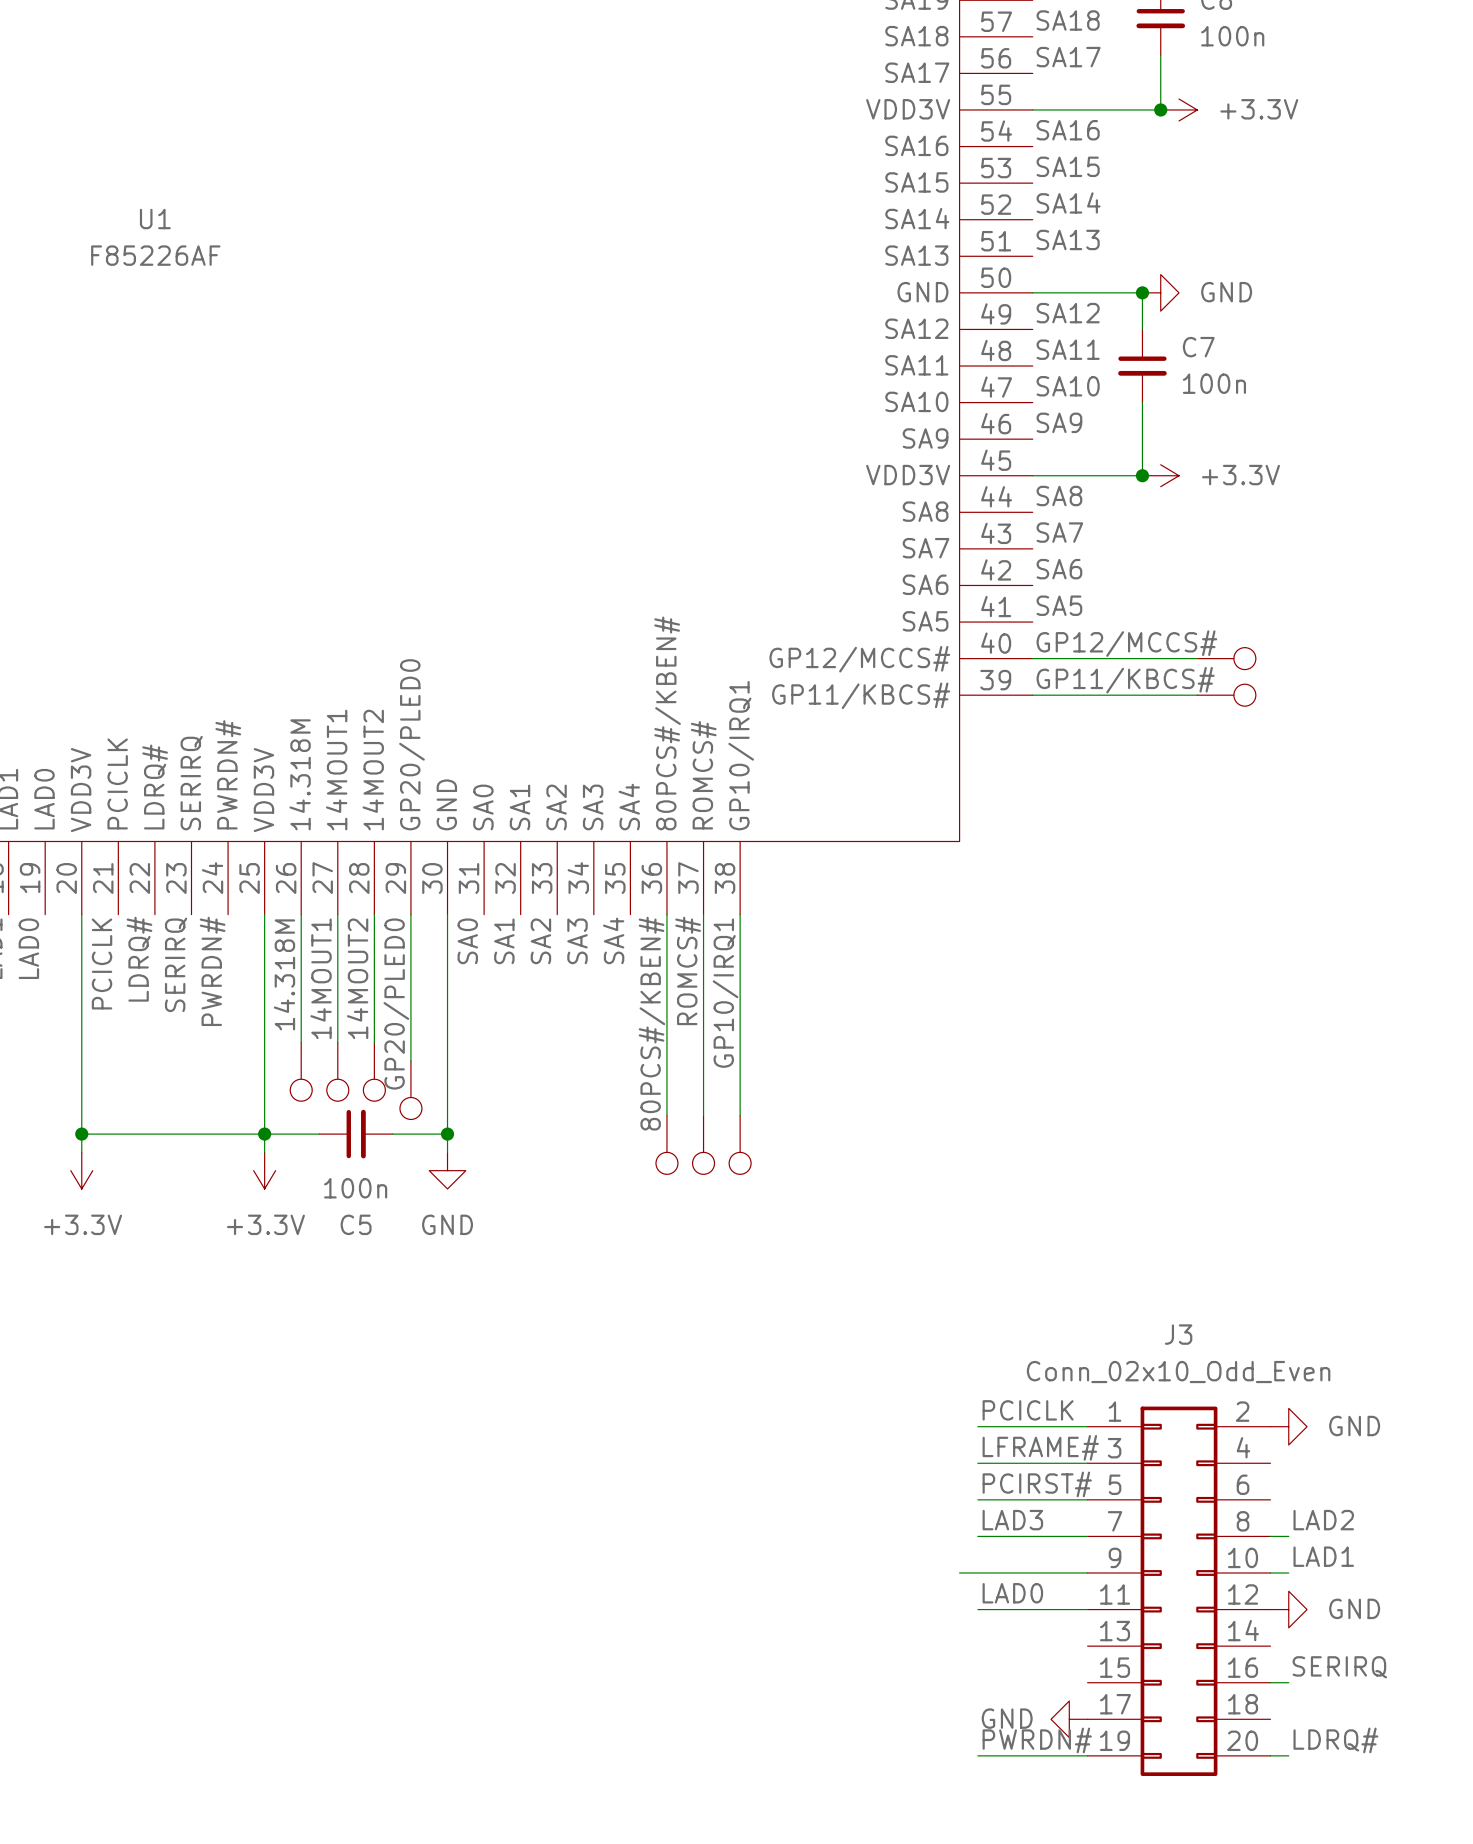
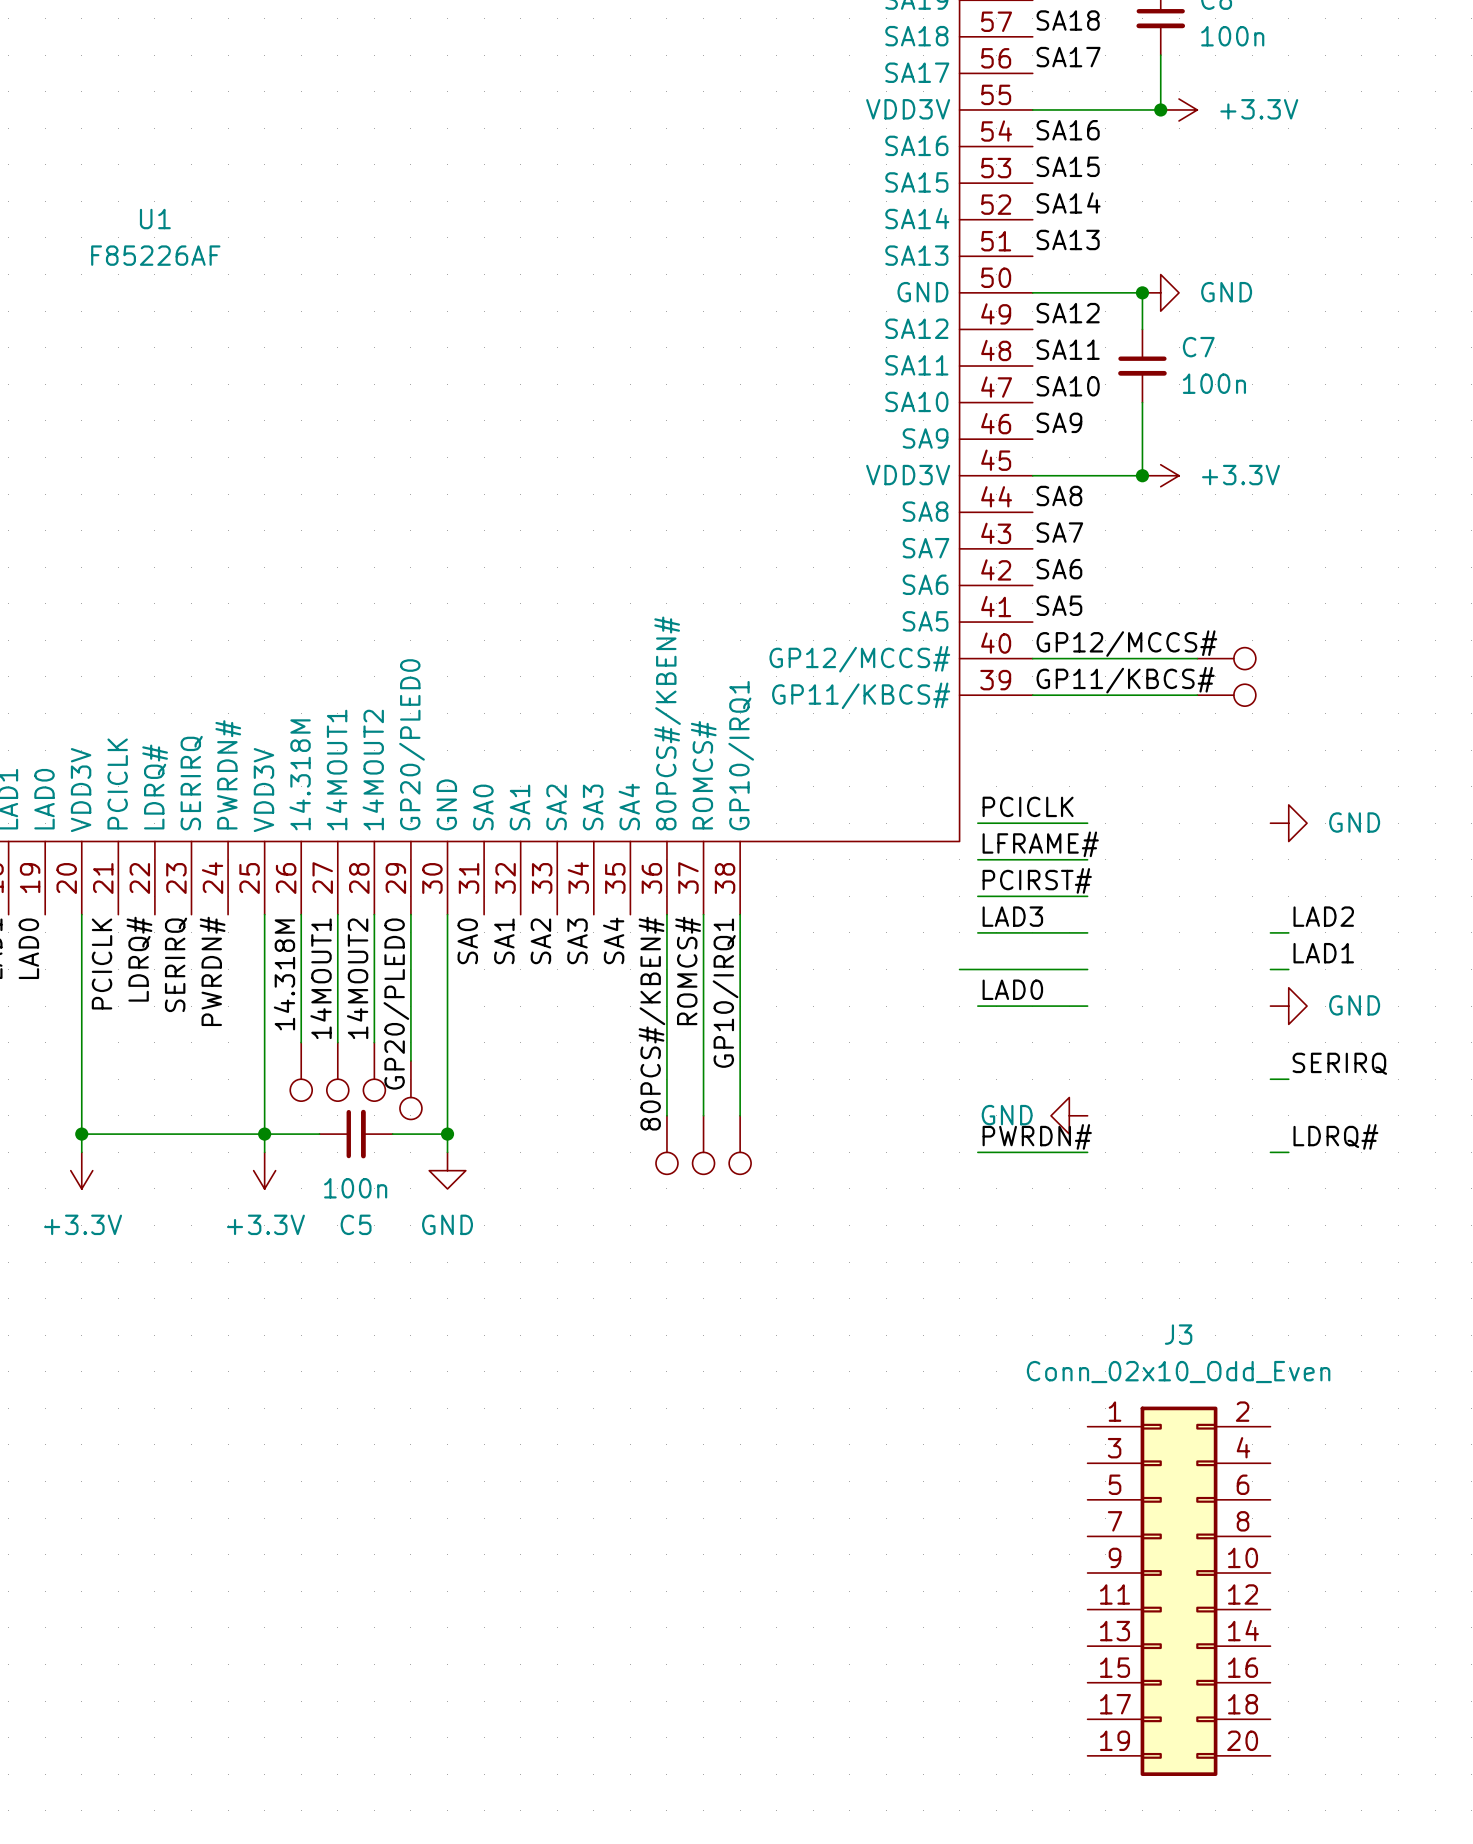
label: none -> PCICLK (1028, 806)
wire: none -> (977, 823) (1087, 823)
power symbol: none -> GND (1288, 823)
label: none -> LFRAME# (1040, 844)
wire: none -> (977, 859) (1087, 859)
label: none -> PCIRST# (1037, 880)
wire: none -> (977, 896) (1087, 896)
label: none -> LAD3 (1012, 916)
label: none -> LAD2 (1323, 916)
wire: none -> (977, 932) (1087, 932)
wire: none -> (1270, 932) (1288, 932)
label: none -> LAD1 (1323, 953)
wire: none -> (959, 969) (1087, 969)
wire: none -> (1270, 969) (1288, 969)
label: none -> LAD0 (1012, 989)
wire: none -> (977, 1006) (1087, 1006)
power symbol: none -> GND (1288, 1006)
label: none -> SERIRQ (1339, 1063)
wire: none -> (1270, 1079) (1288, 1079)
power symbol: none -> GND (1069, 1115)
label: none -> PWRDN# (1037, 1136)
label: none -> LDRQ# (1335, 1136)
wire: none -> (1270, 1152) (1288, 1152)
label: PCICLK (1028, 1410) -> none
wire: (977, 1426) (1087, 1426) -> (977, 1152) (1087, 1152)
power symbol: GND (1288, 1426) -> none
label: LFRAME# (1040, 1447) -> none
wire: (977, 1463) (1087, 1463) -> none
label: PCIRST# (1037, 1484) -> none
wire: (977, 1499) (1087, 1499) -> none
label: LAD3 (1012, 1520) -> none
label: LAD2 (1323, 1520) -> none
wire: (977, 1536) (1087, 1536) -> none
wire: (1270, 1536) (1288, 1536) -> none
label: LAD1 (1323, 1556) -> none
wire: (959, 1573) (1087, 1573) -> none
wire: (1270, 1573) (1288, 1573) -> none
label: LAD0 (1012, 1593) -> none
wire: (977, 1609) (1087, 1609) -> none
power symbol: GND (1288, 1609) -> none
label: SERIRQ (1339, 1667) -> none
wire: (1270, 1682) (1288, 1682) -> none
power symbol: GND (1069, 1719) -> none
label: PWRDN# (1037, 1740) -> none
label: LDRQ# (1335, 1740) -> none
wire: (977, 1755) (1087, 1755) -> none
wire: (1270, 1755) (1288, 1755) -> none

